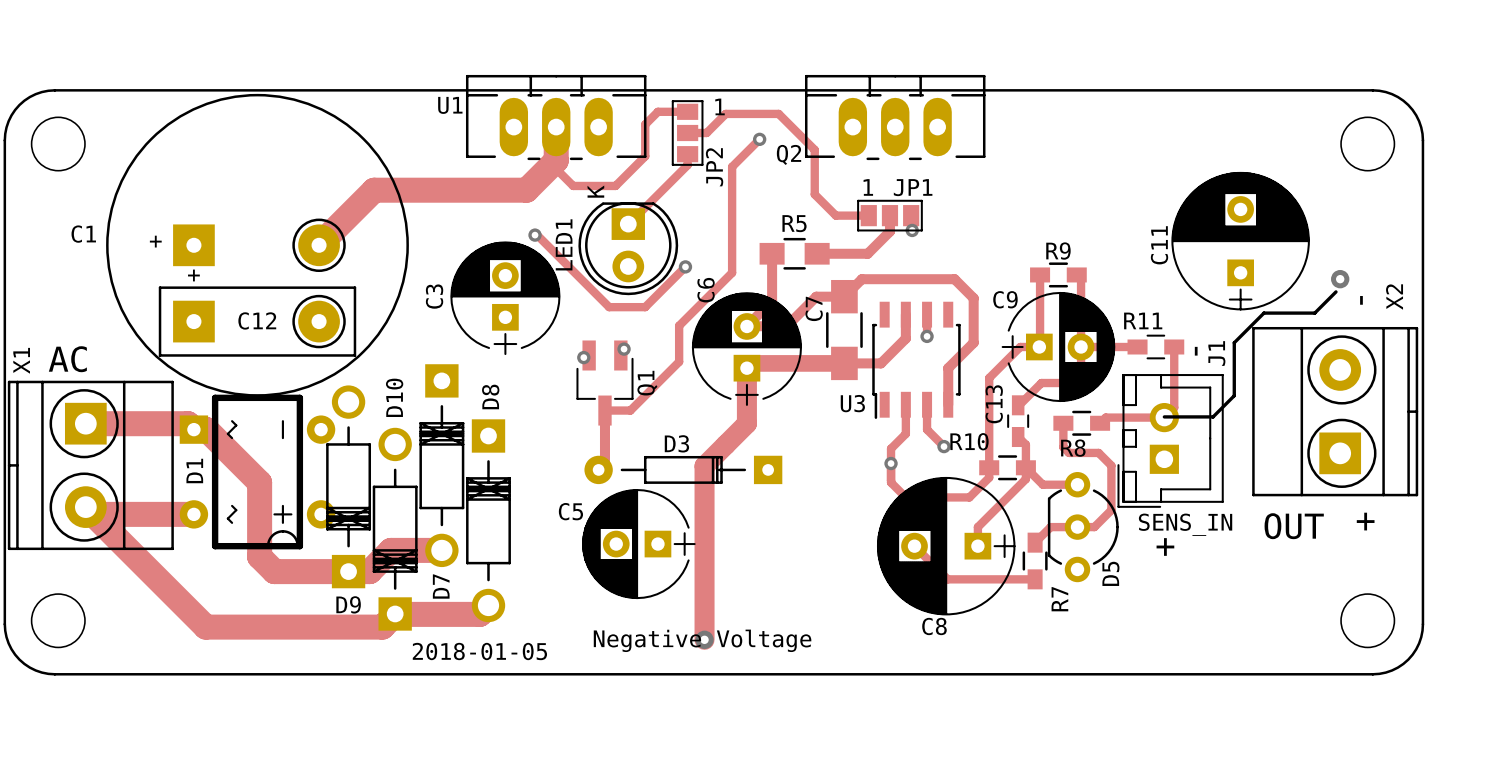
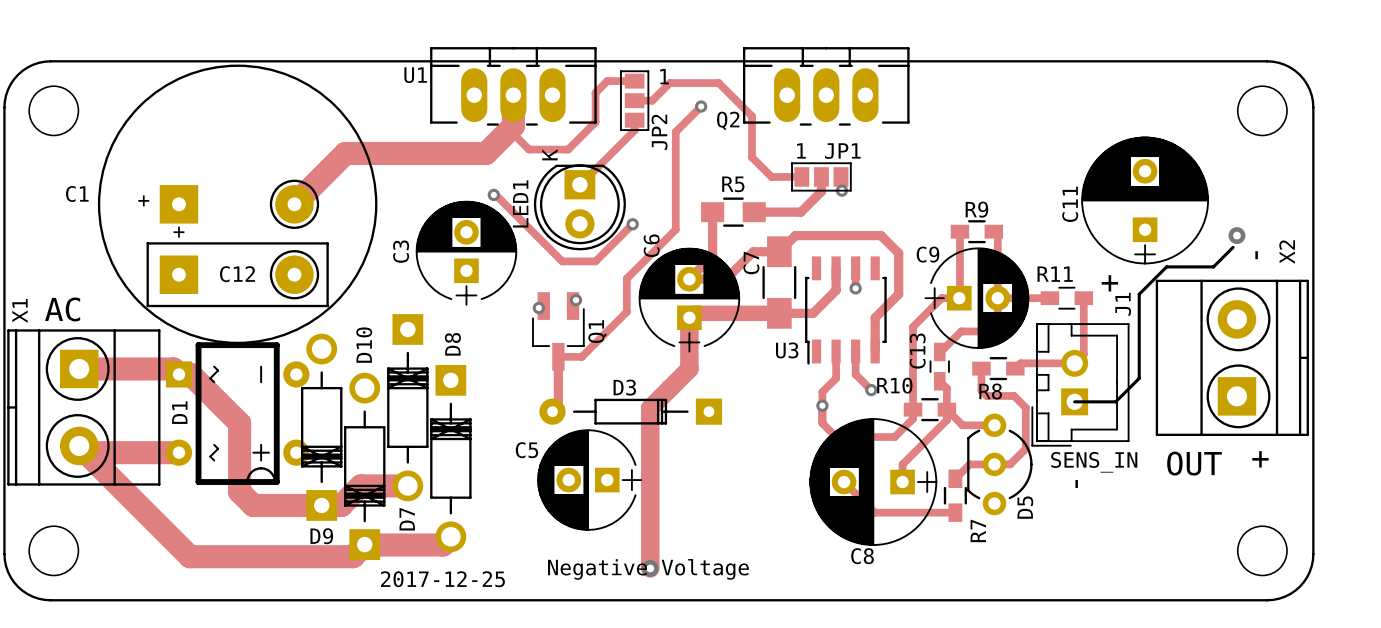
text: none -> + (1109, 283)
text: - (1196, 351) -> none
line: (1234, 395) (1213, 416) (1164, 416) -> (1139, 343) (1139, 378) (1115, 401) (1074, 401)
text: + (1165, 546) -> - (1076, 483)
text: 2018-01-05 (479, 651) -> 2017-12-25 (442, 579)

